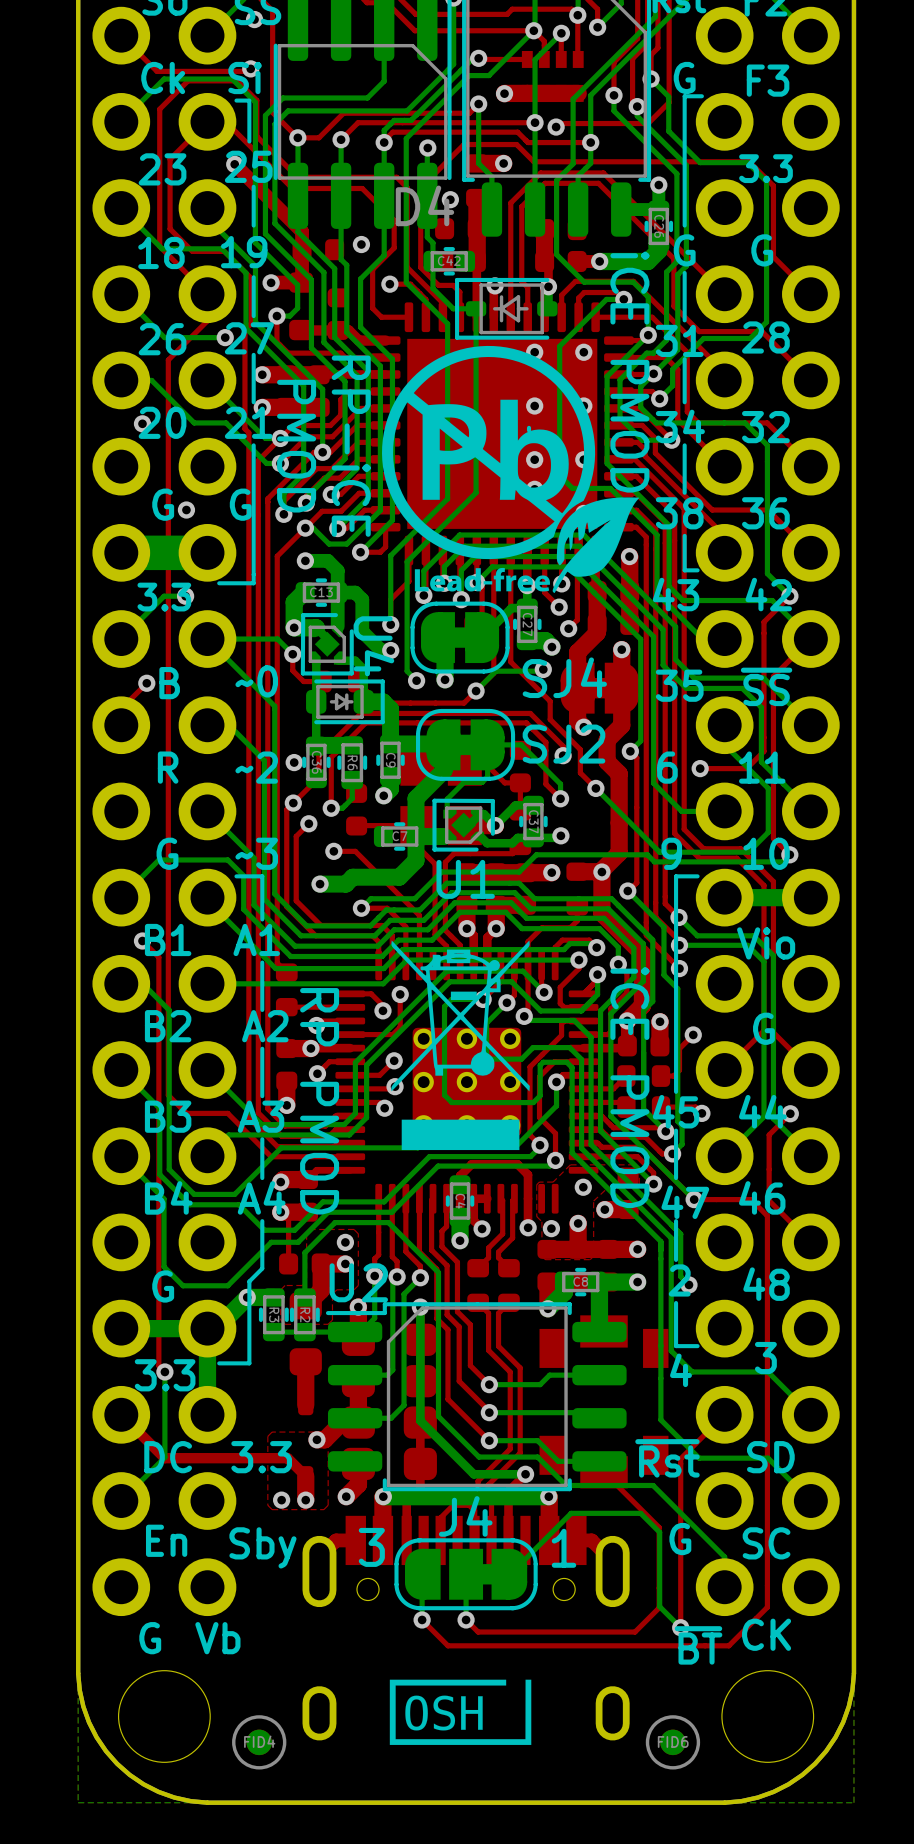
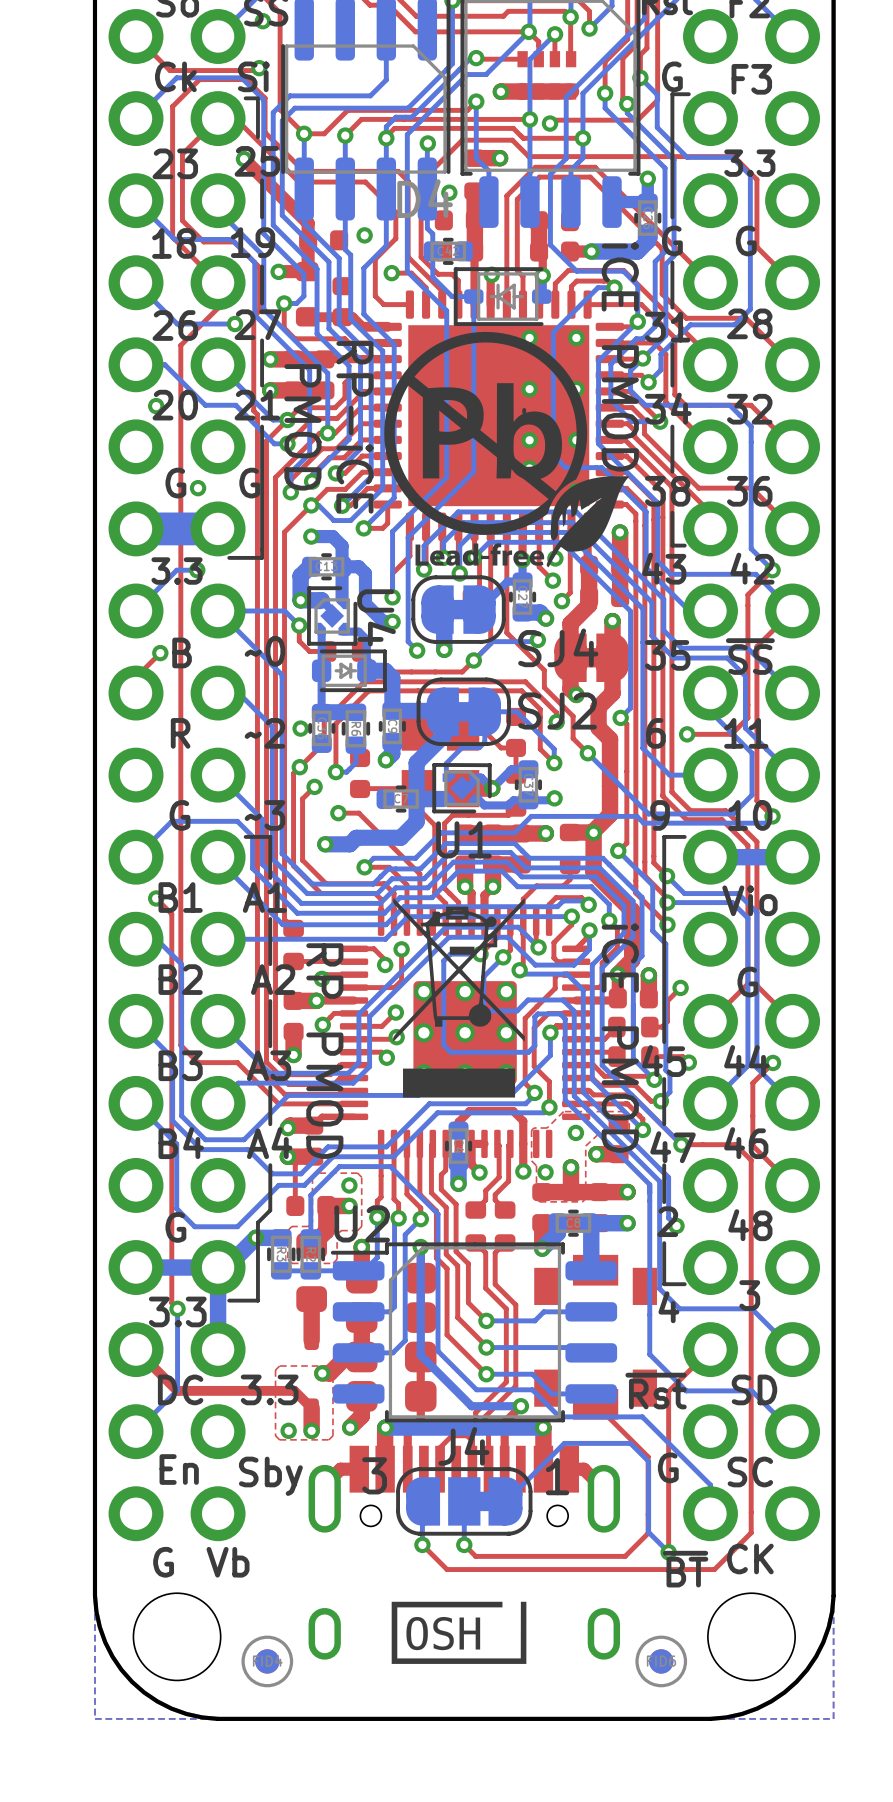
U4 footprint: [300, 613, 354, 676] -> [306, 586, 358, 646]
U1 footprint: [432, 798, 495, 852] -> [432, 762, 492, 814]

